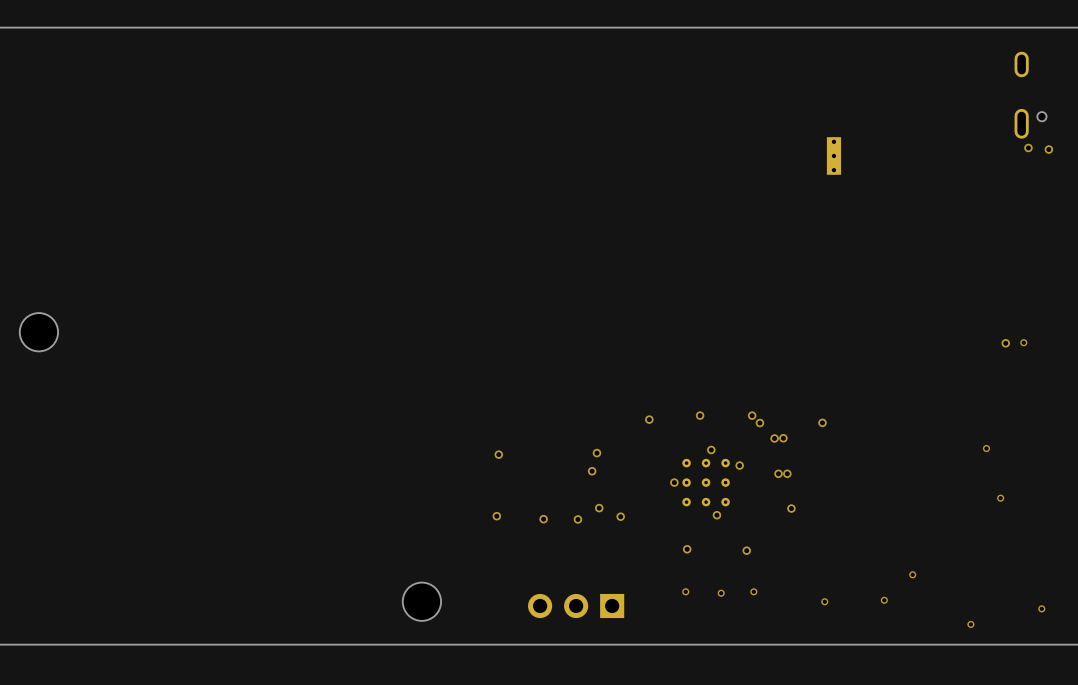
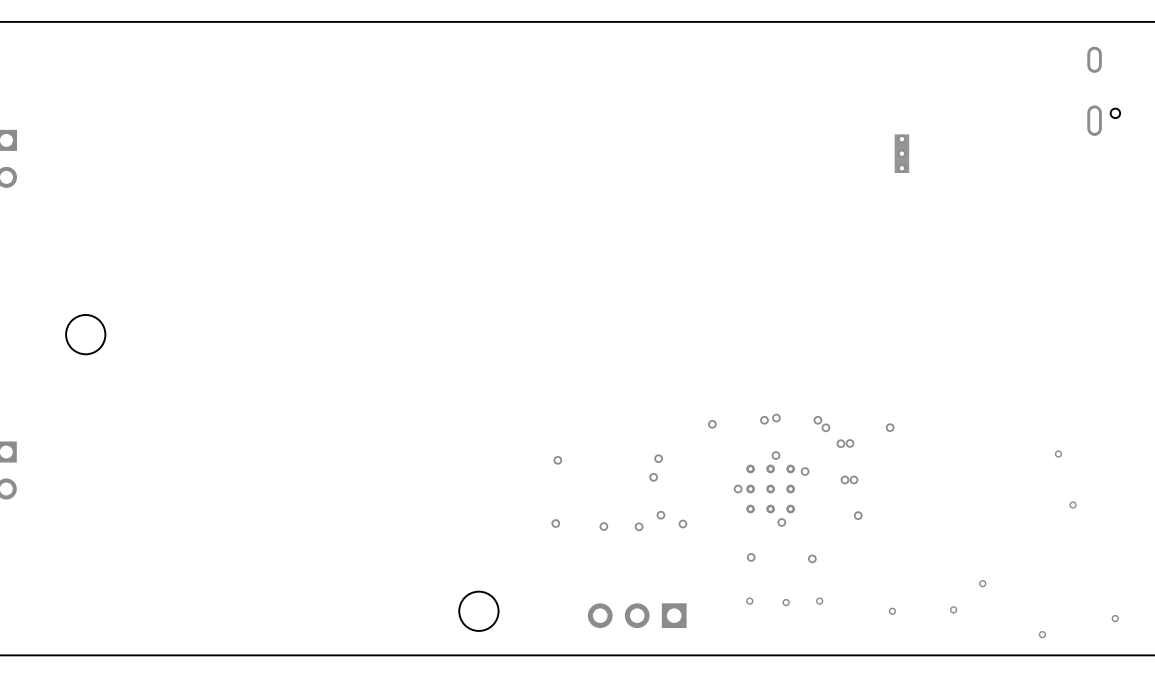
via: (1028, 147) -> none
via: (1048, 149) -> none
via: (1023, 342) -> none
via: (1005, 343) -> none
via: none -> (776, 418)

